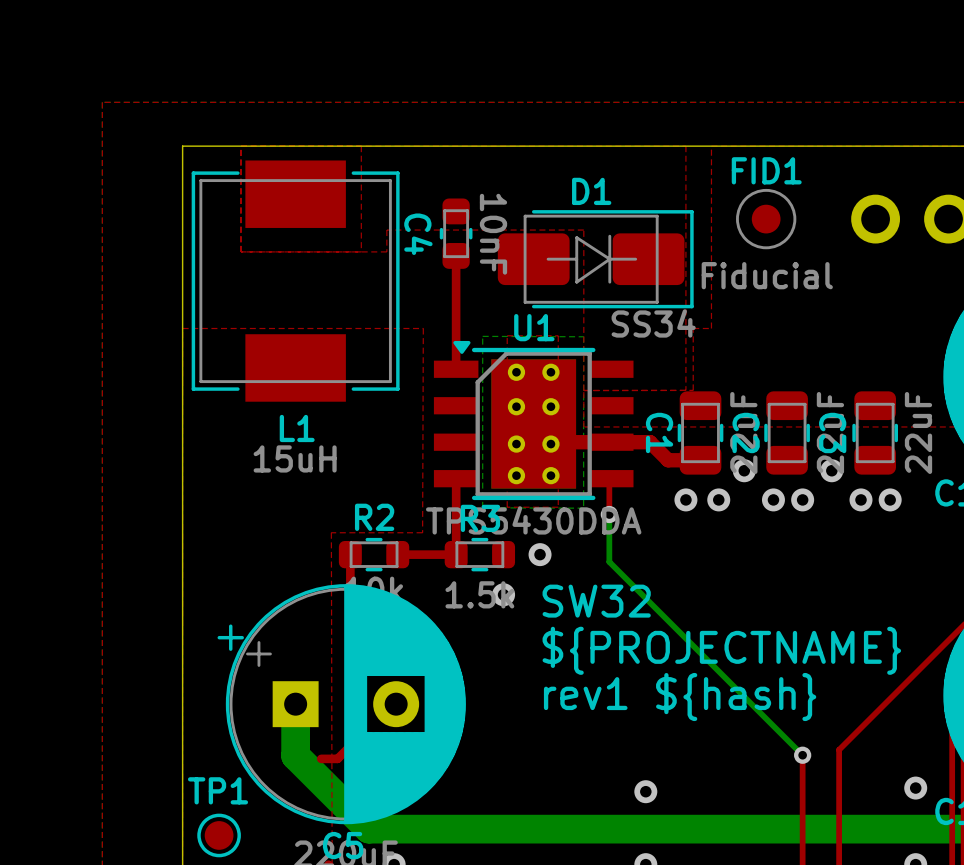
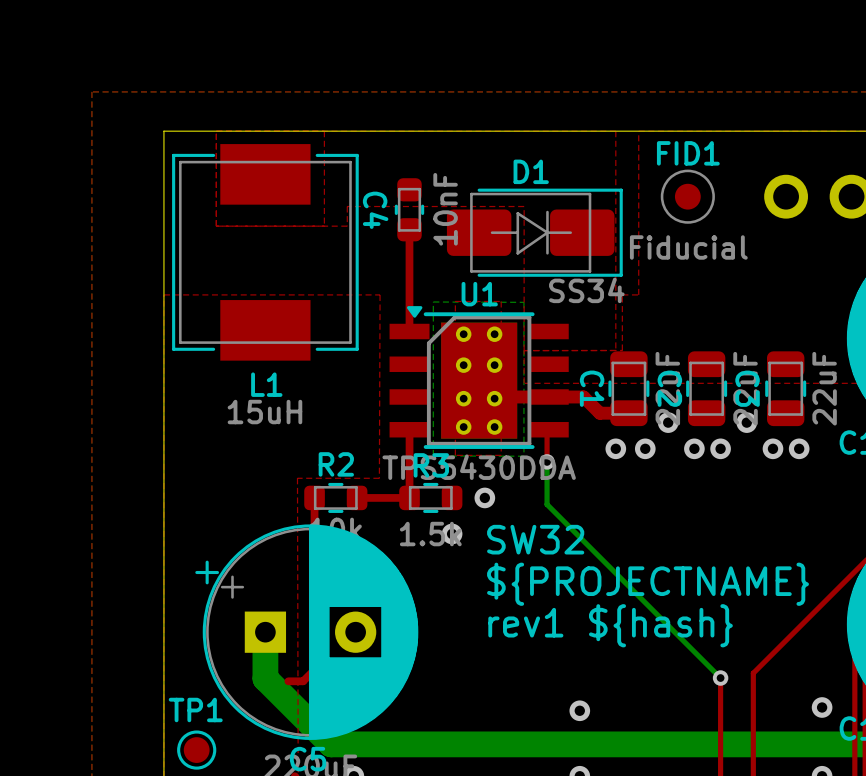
C4 value rotation: 0° (493, 234) -> 180° (445, 209)

